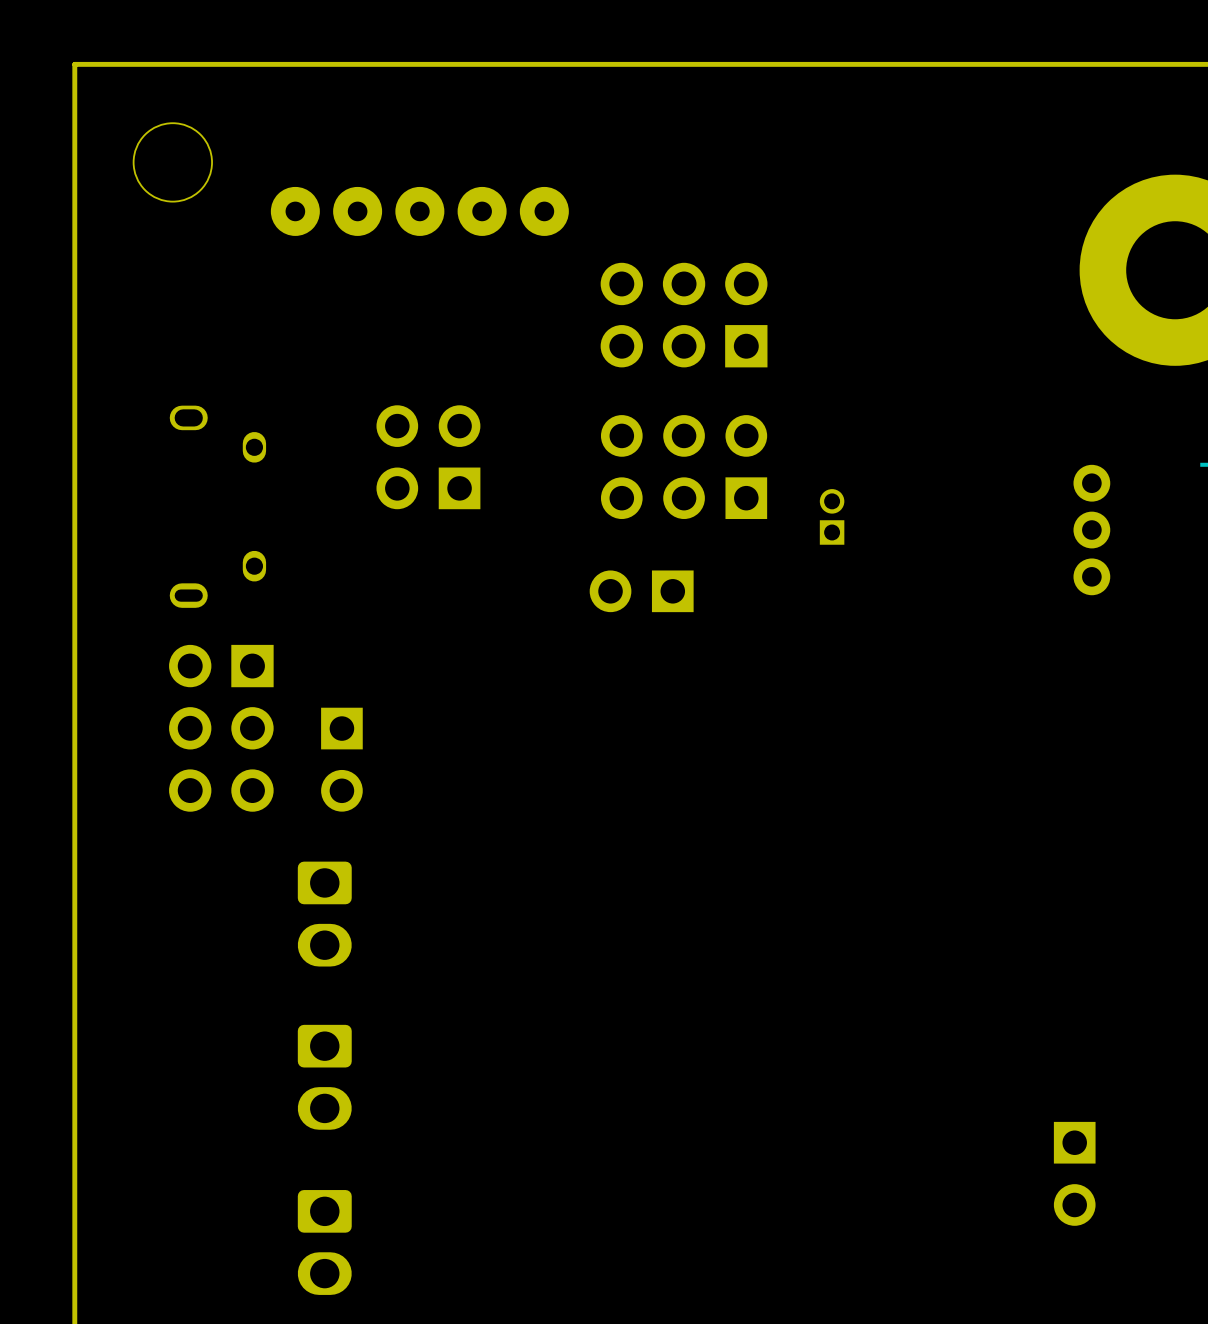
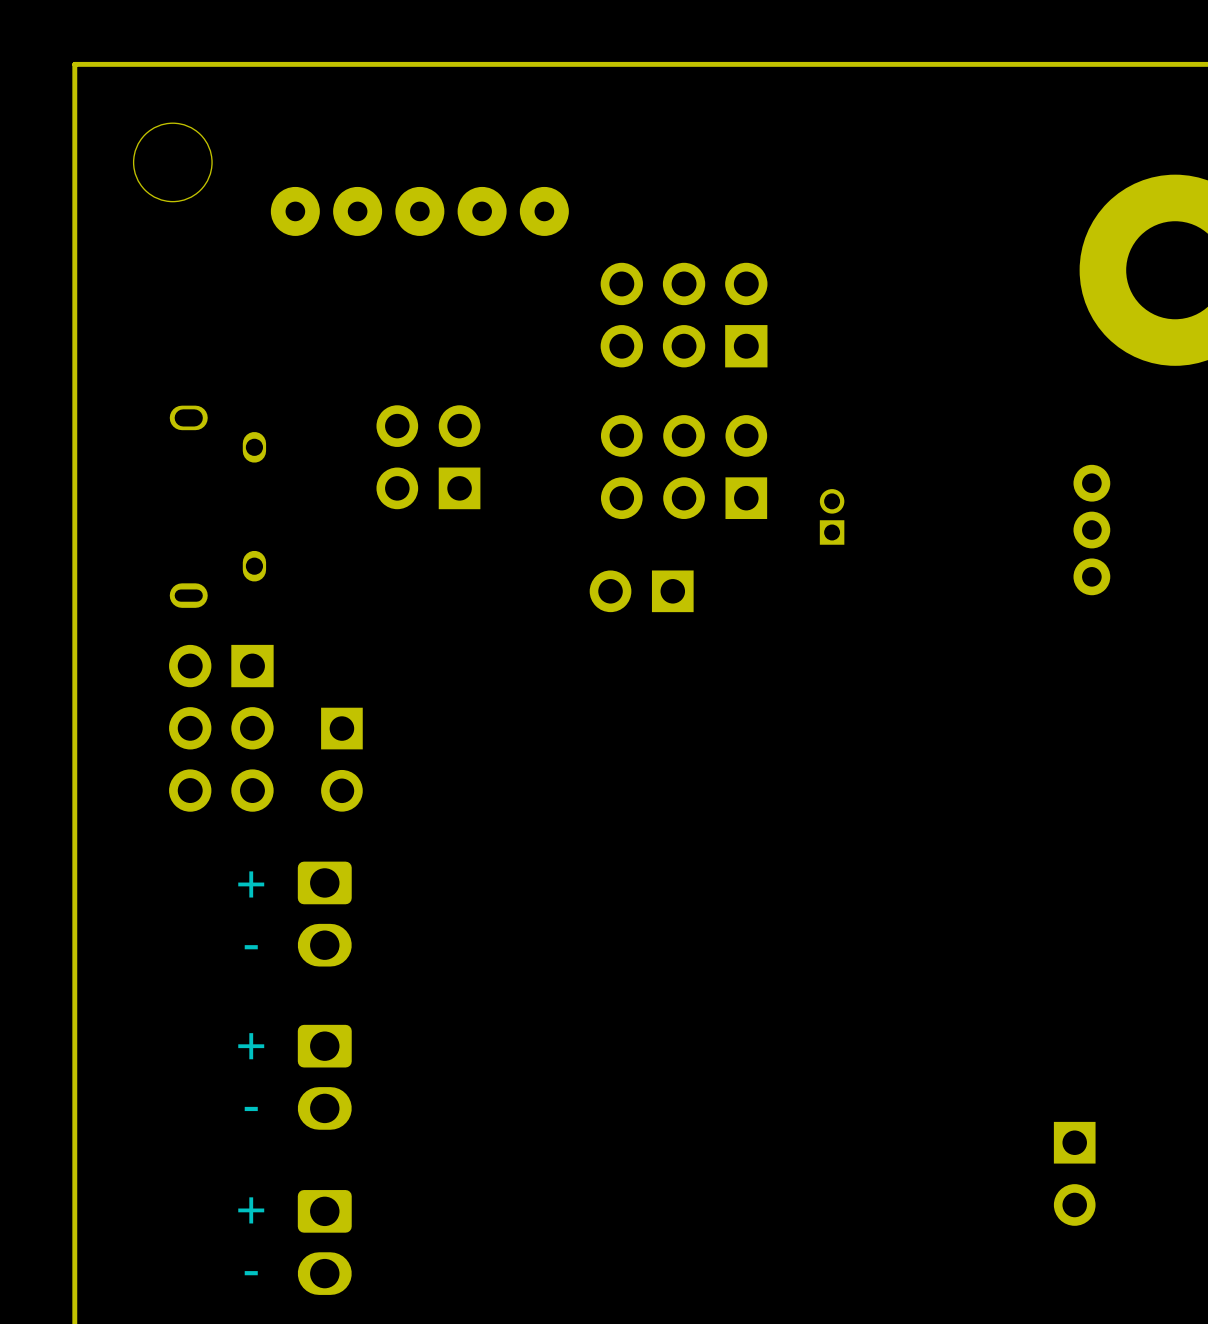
text: none -> + (251, 884)
text: none -> - (251, 947)
text: none -> + (251, 1046)
text: none -> - (251, 1108)
text: none -> + (251, 1210)
text: none -> - (251, 1273)

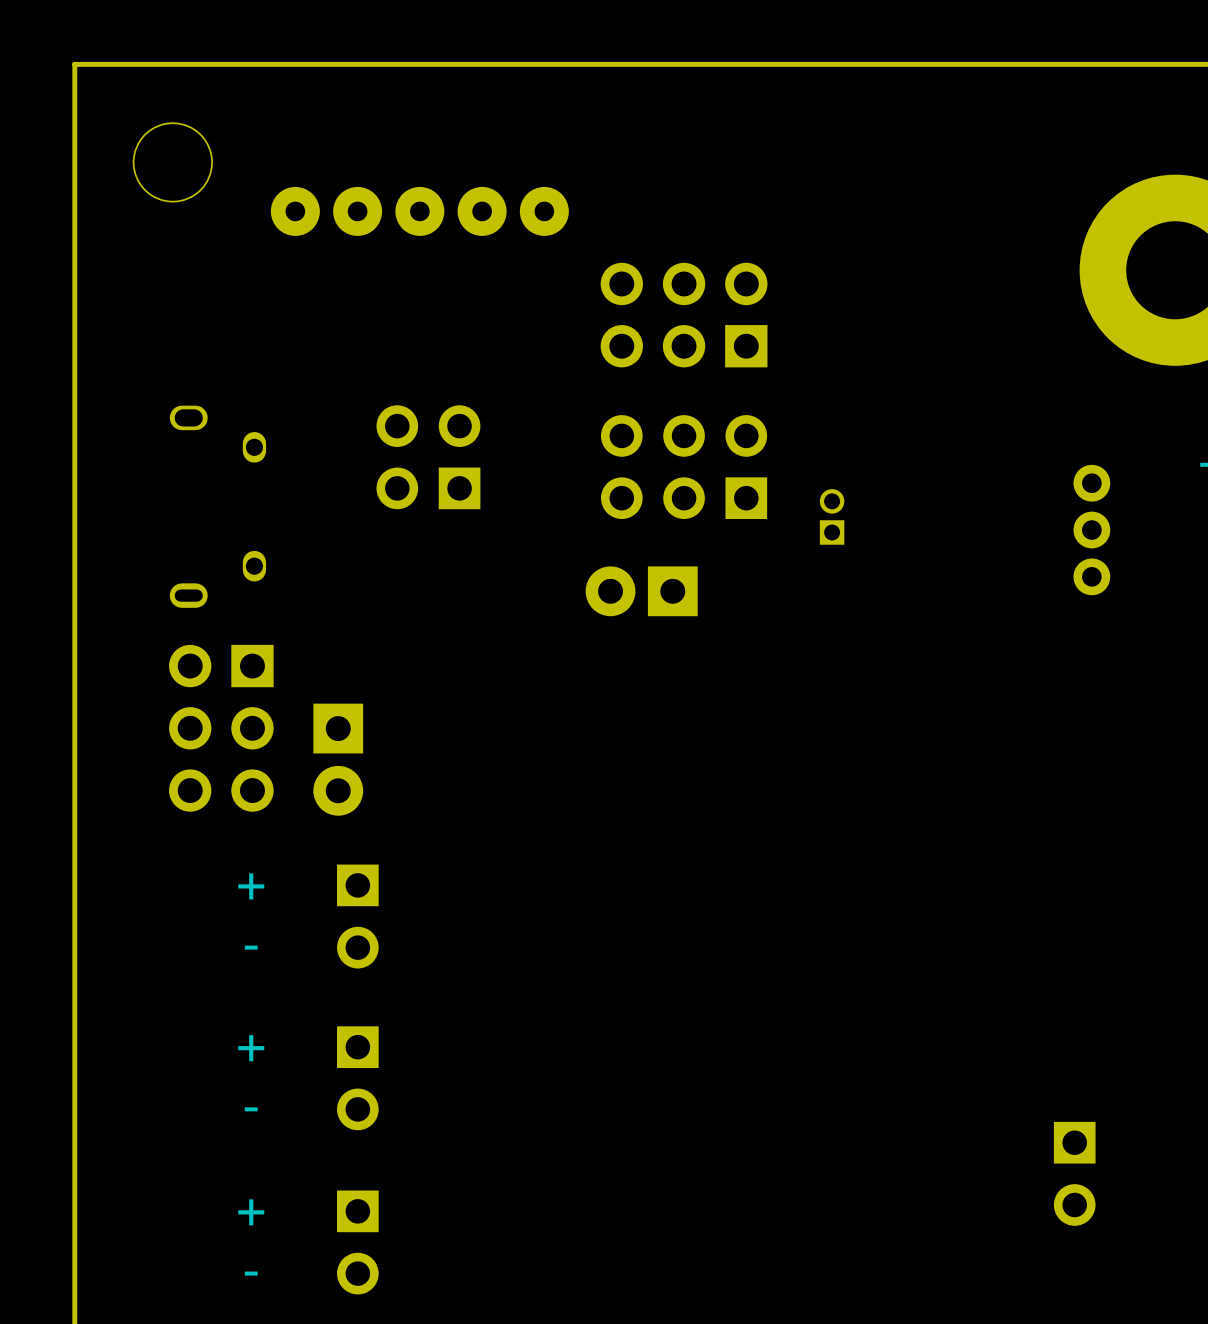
part footprint: [589, 570, 694, 613] -> [585, 566, 698, 617]
part footprint: [321, 707, 363, 812] -> [313, 703, 364, 816]
part: (324, 914) -> none
part: none -> (357, 916)
part: (324, 1077) -> none
part: none -> (357, 1078)
part: (324, 1242) -> none
part: none -> (357, 1242)

